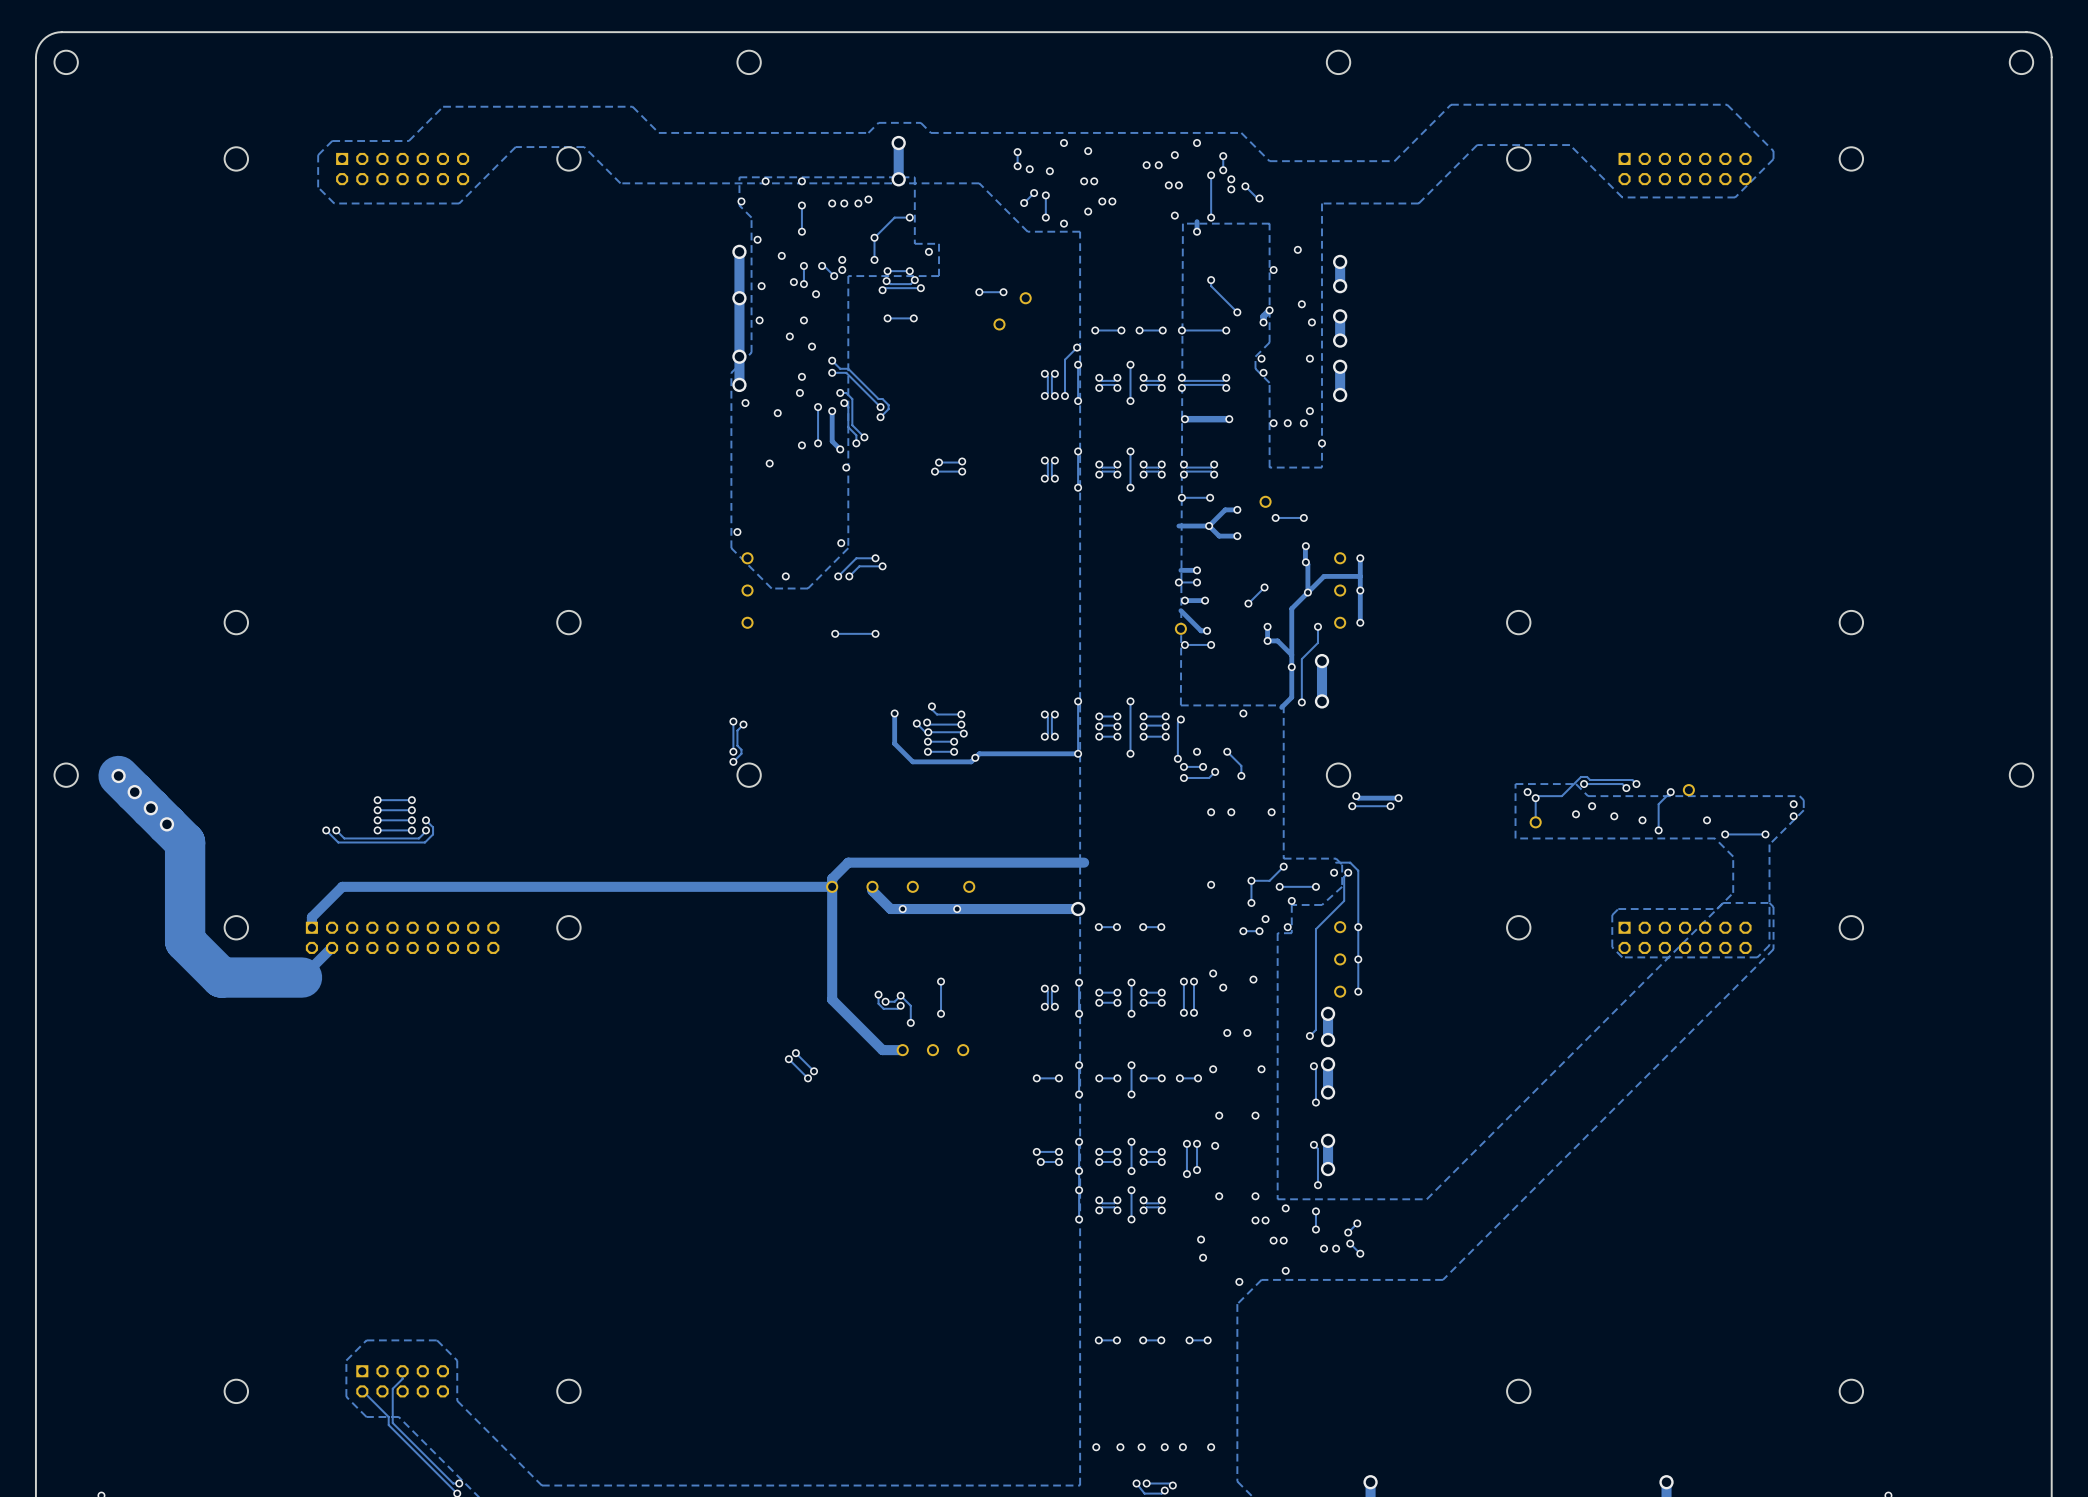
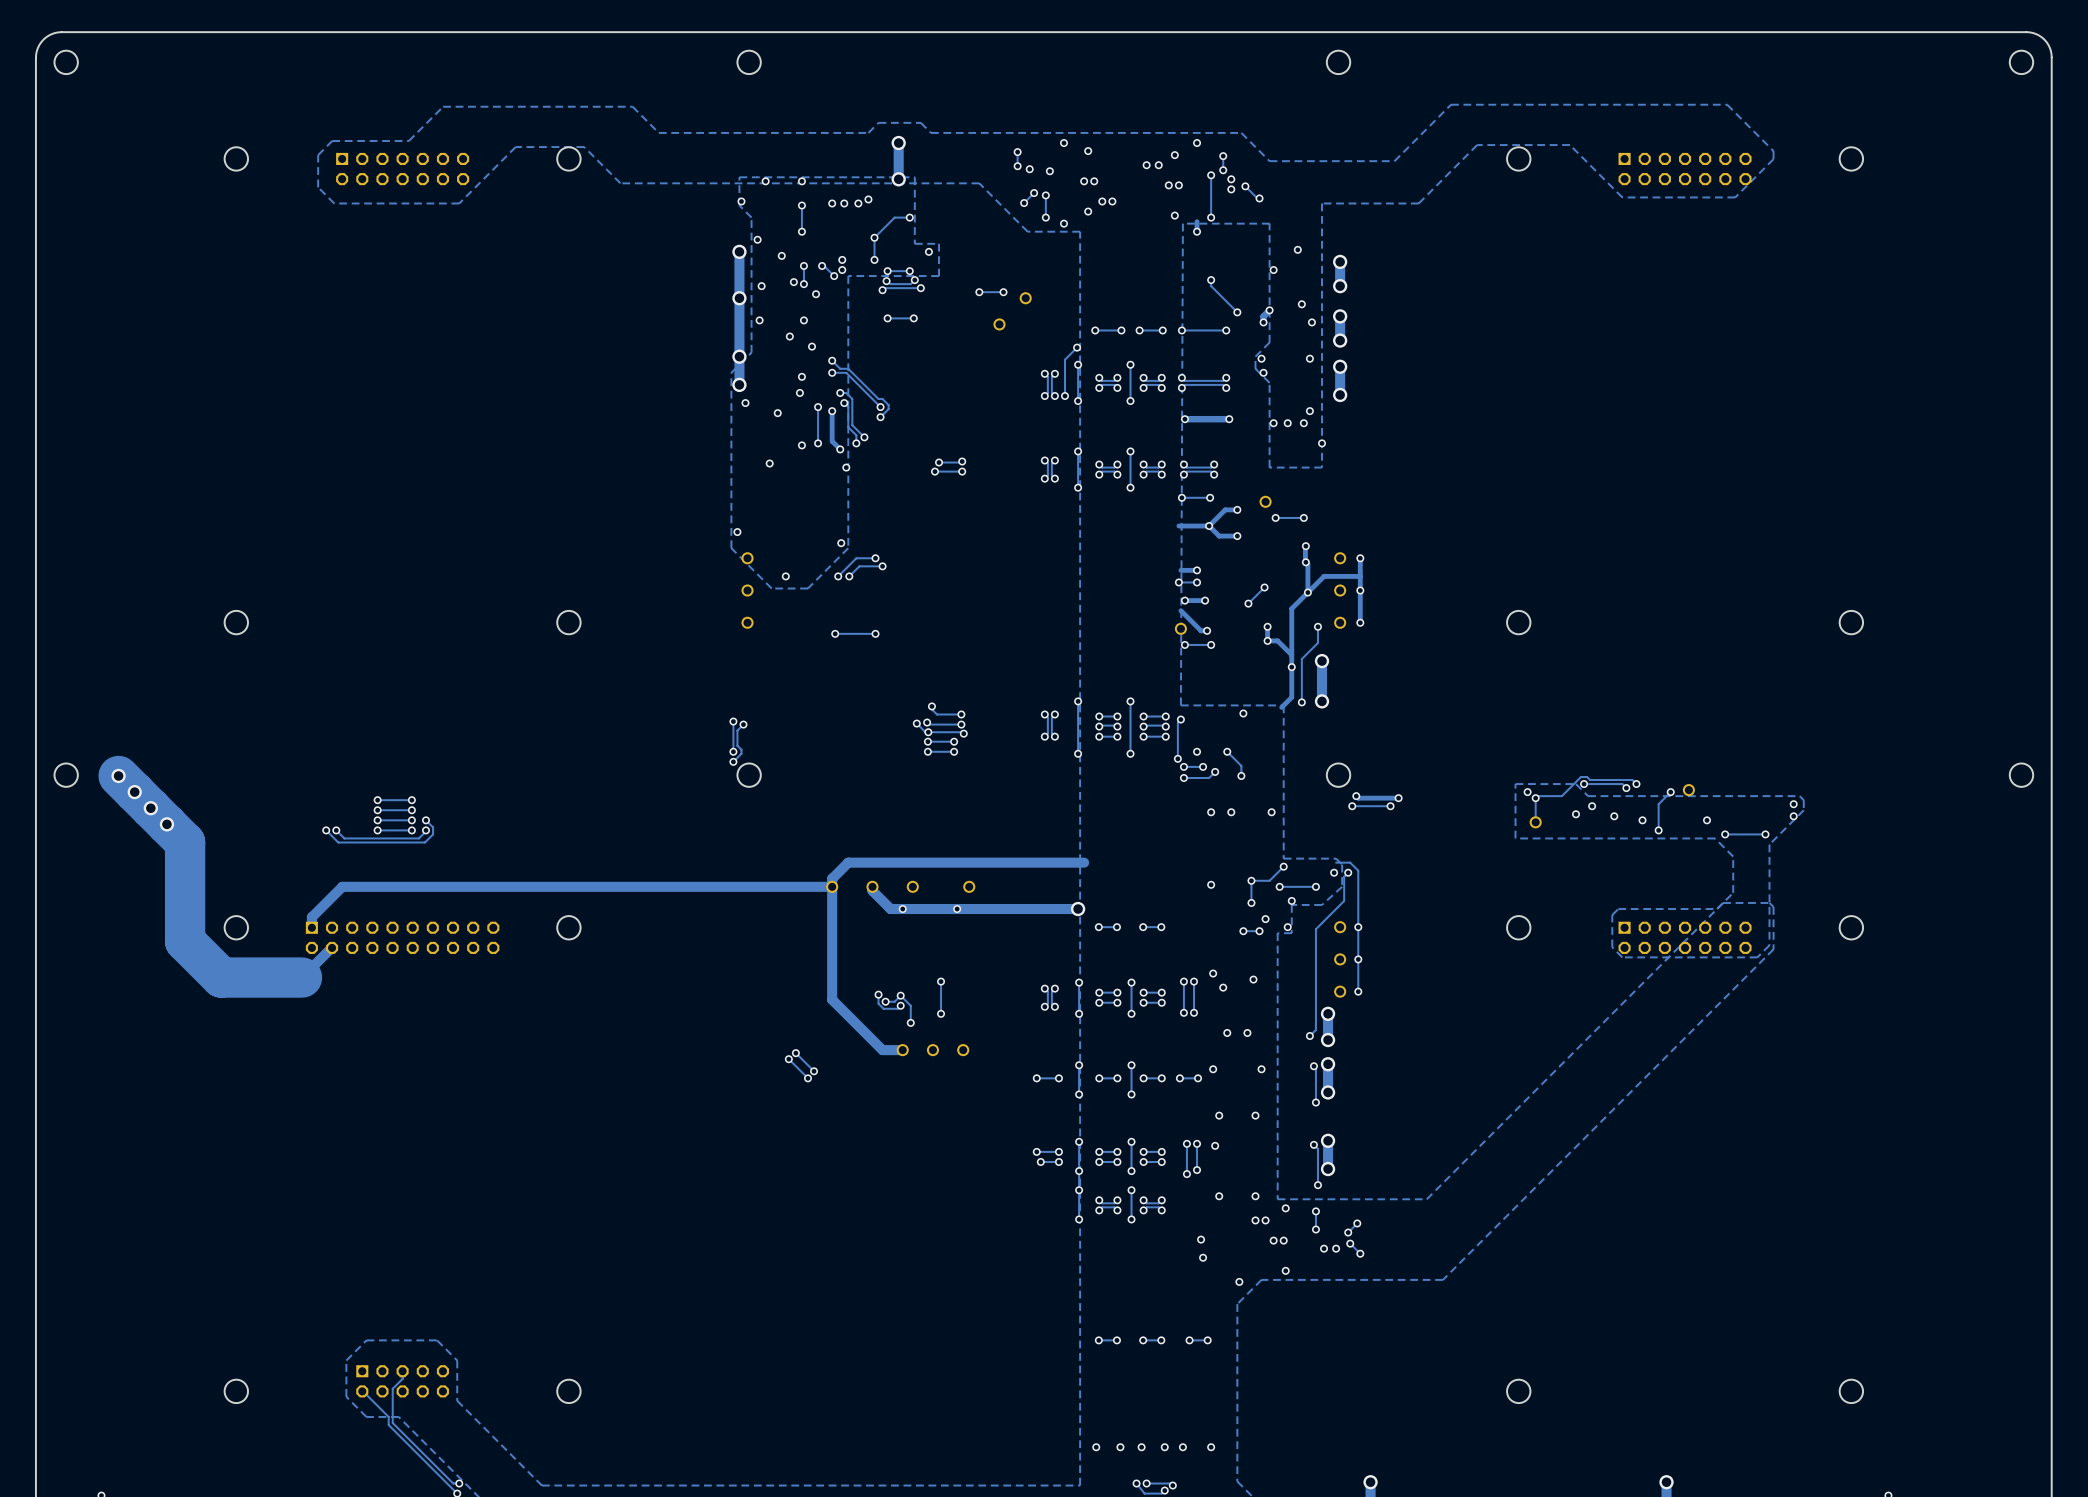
track: (894, 713) (894, 743) (912, 761) (971, 761) (979, 753) (1078, 753) -> none
via: (894, 713) -> none
via: (975, 757) -> none

